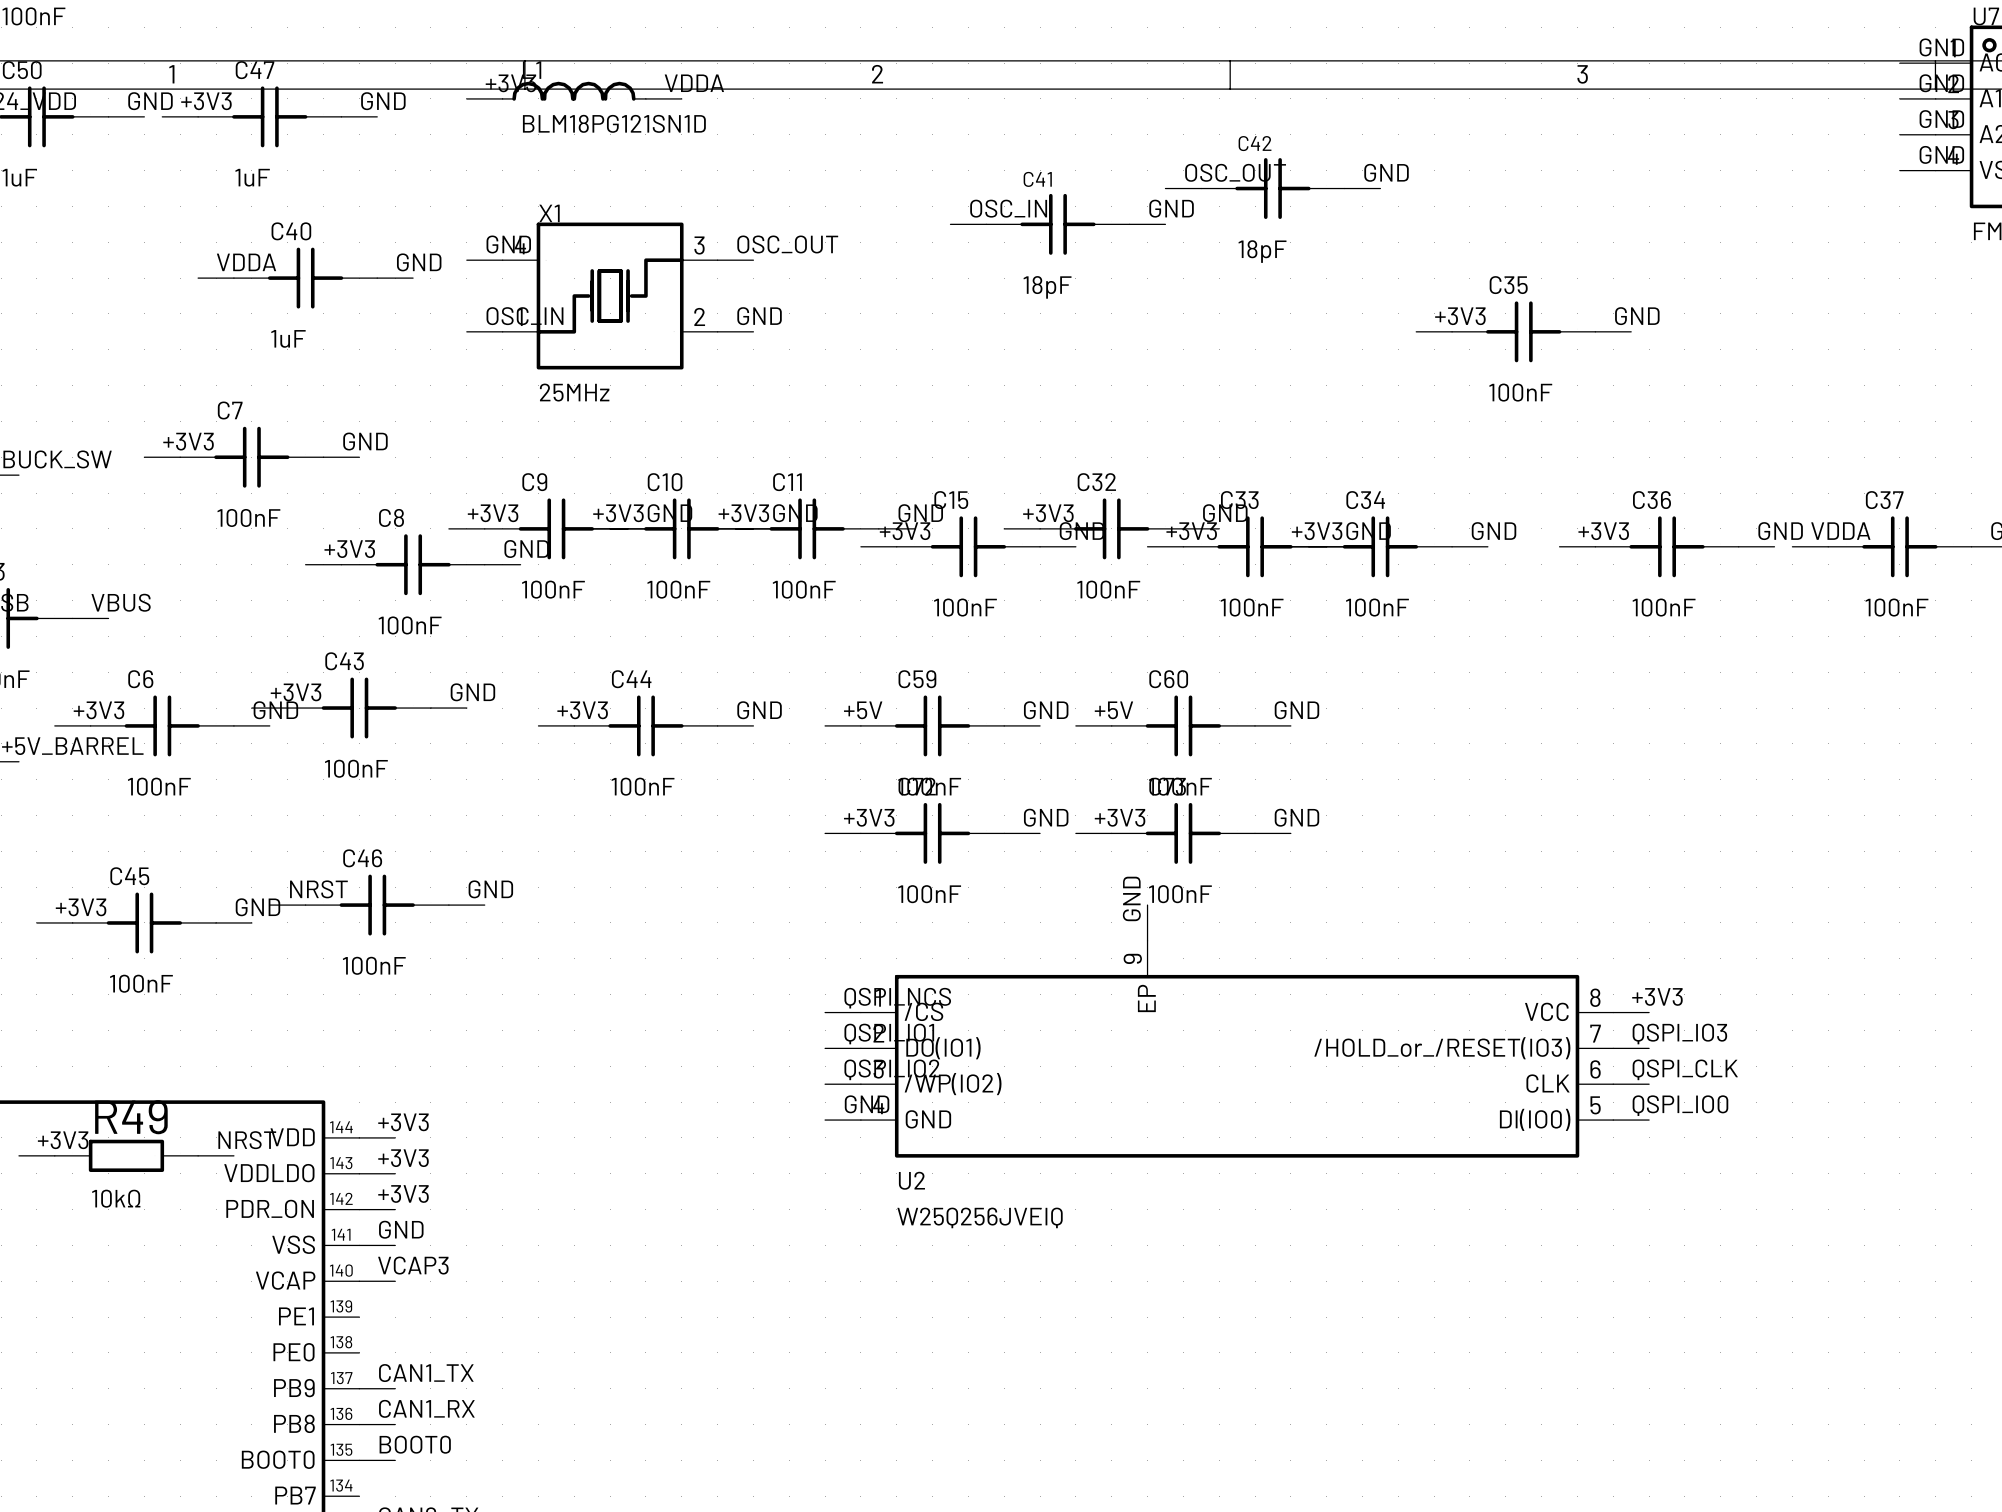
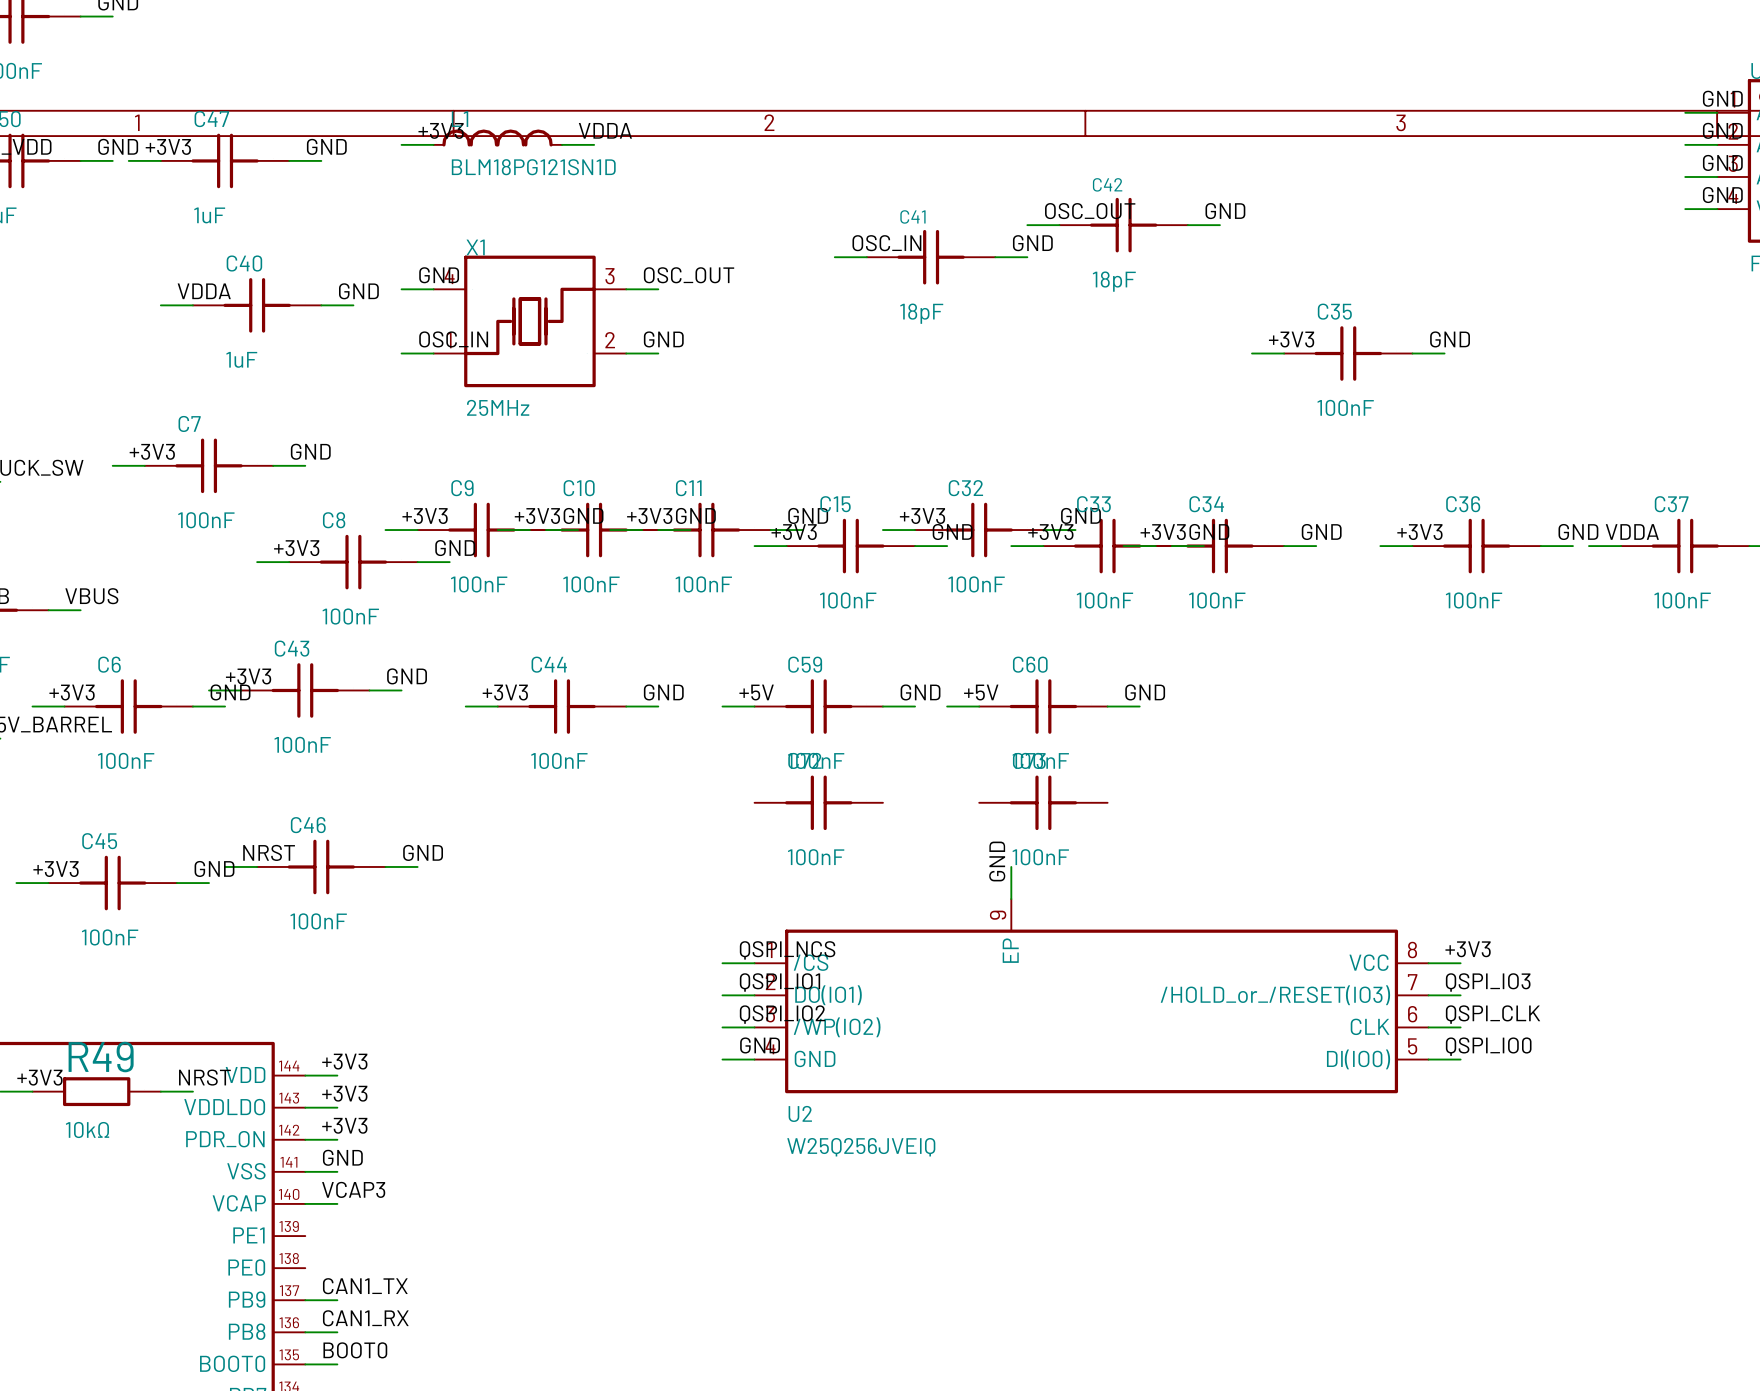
label: +3V3 (869, 817) -> none
label: GND (1046, 817) -> none
label: +3V3 (1120, 817) -> none
label: GND (1296, 817) -> none
wire: (825, 833) (860, 833) -> none
wire: (1004, 833) (1040, 833) -> none
wire: (1075, 833) (1111, 833) -> none
wire: (1255, 833) (1290, 833) -> none

